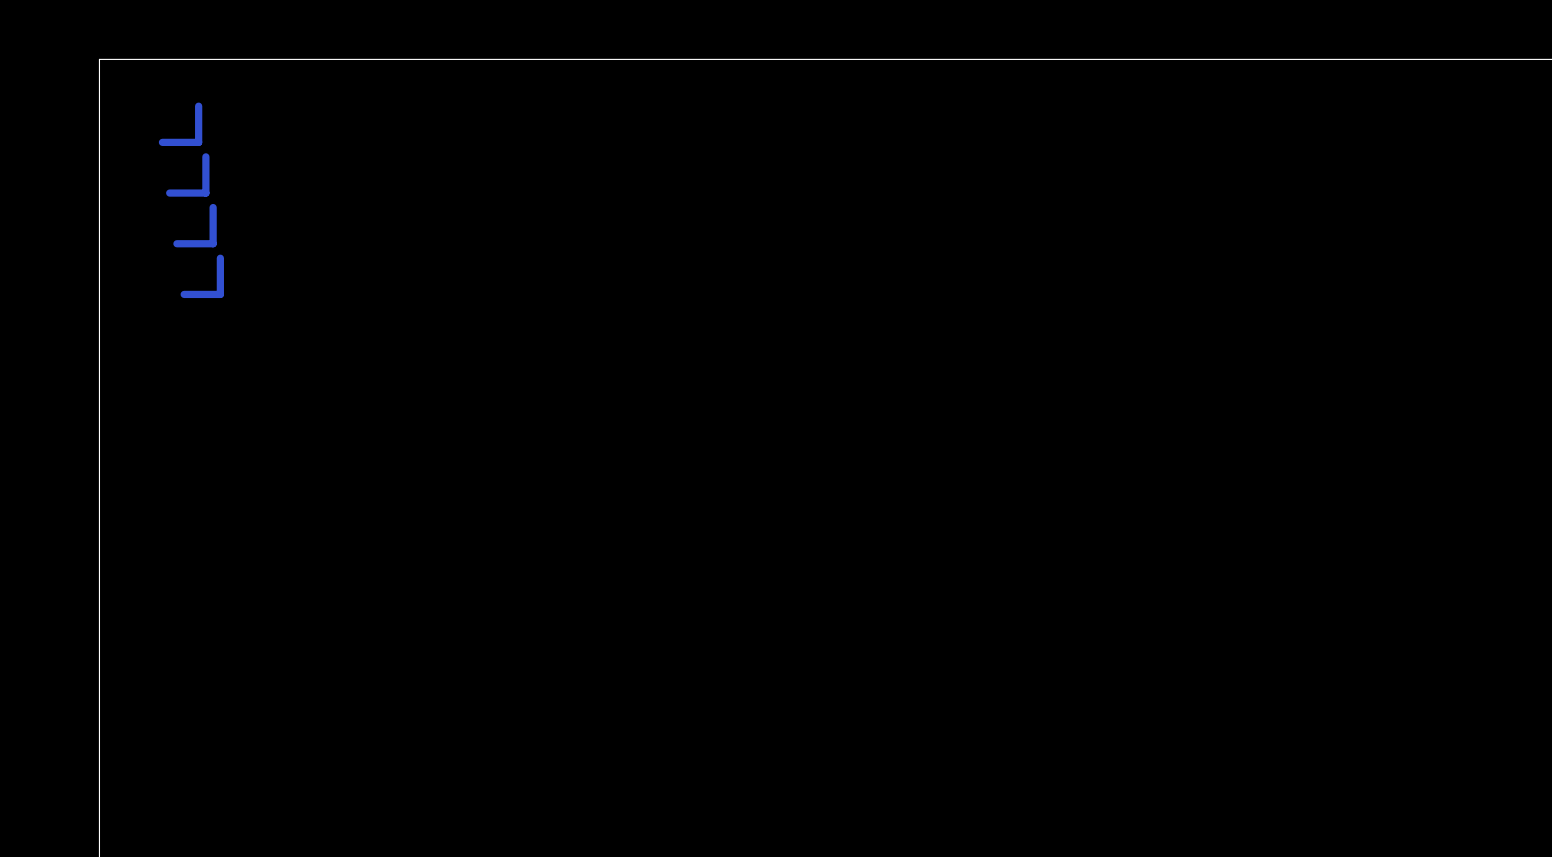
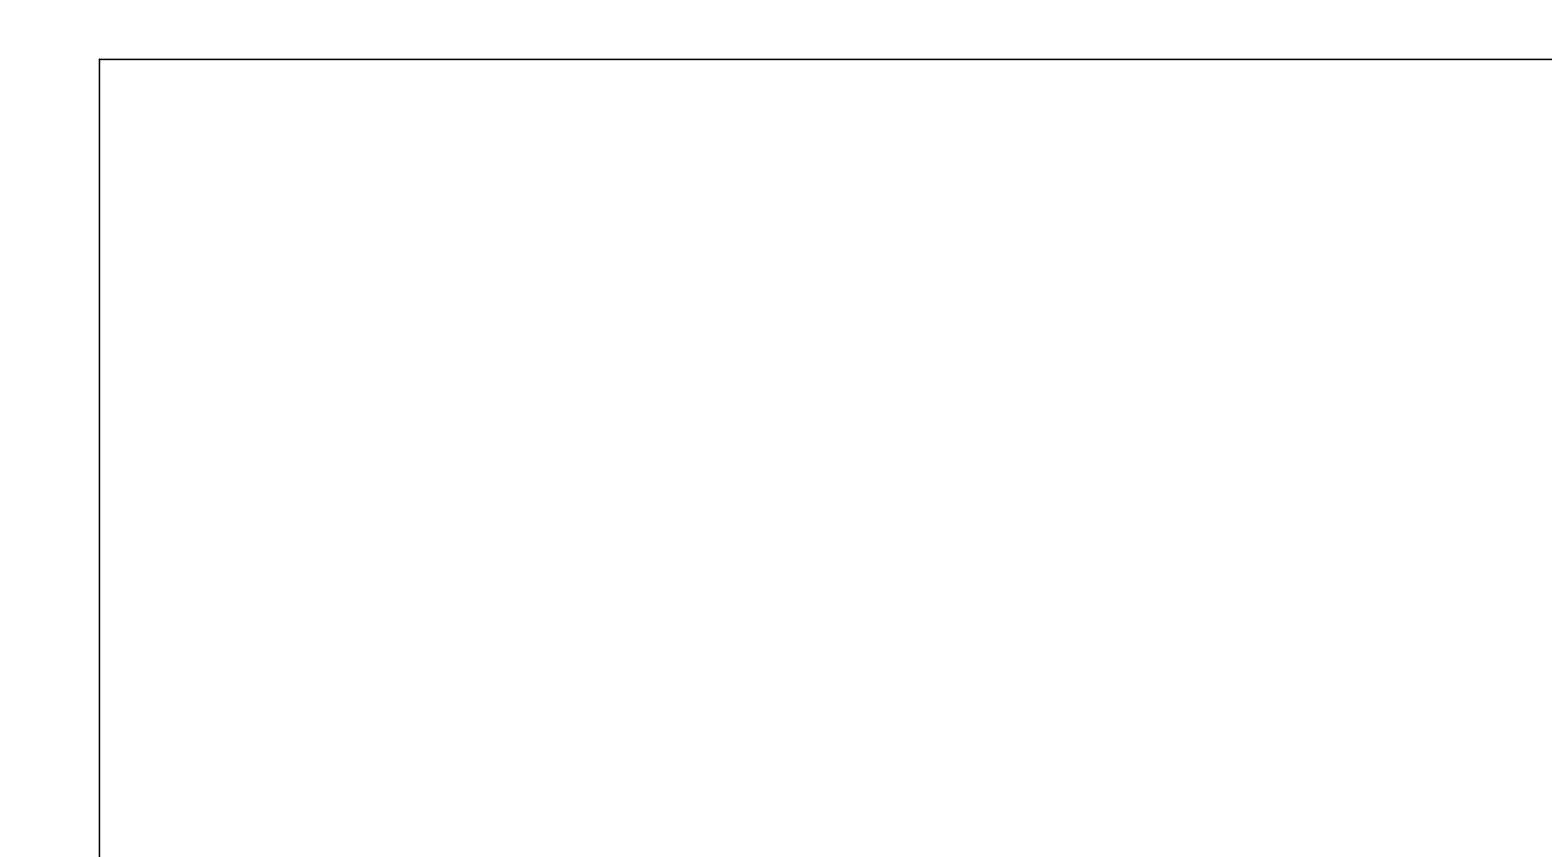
drawing: [158, 102, 224, 299] -> none

